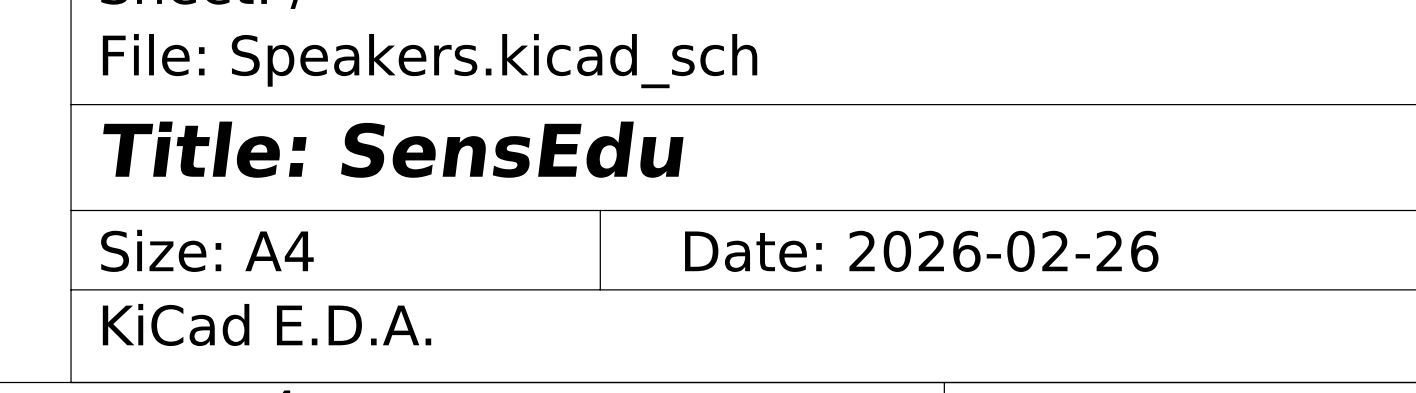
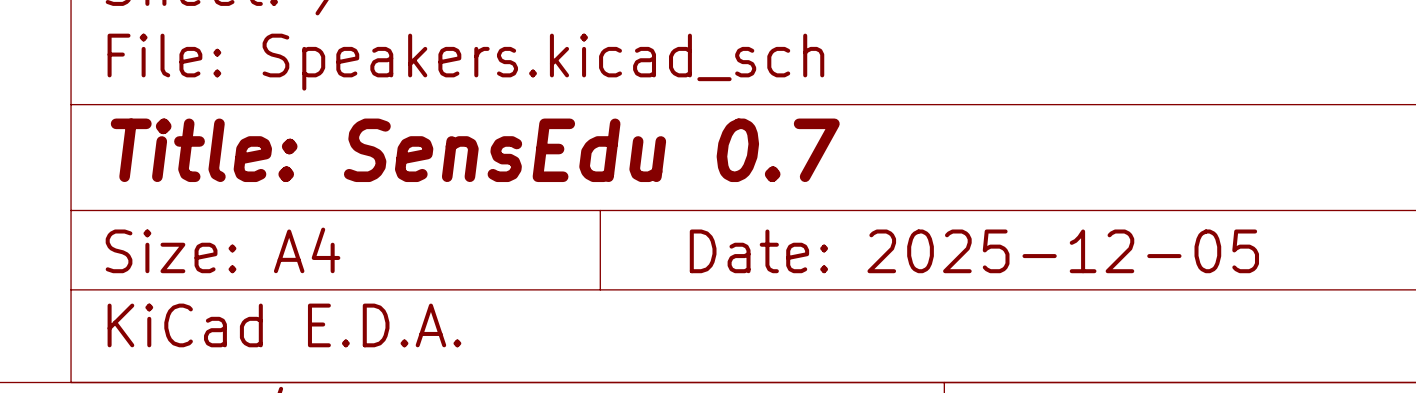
title block: Title: SensEdu (393, 149) -> Title: SensEdu 0.7 (475, 150)
title block: Date: 2026-02-26 (921, 251) -> Date: 2025-12-05 (974, 251)

